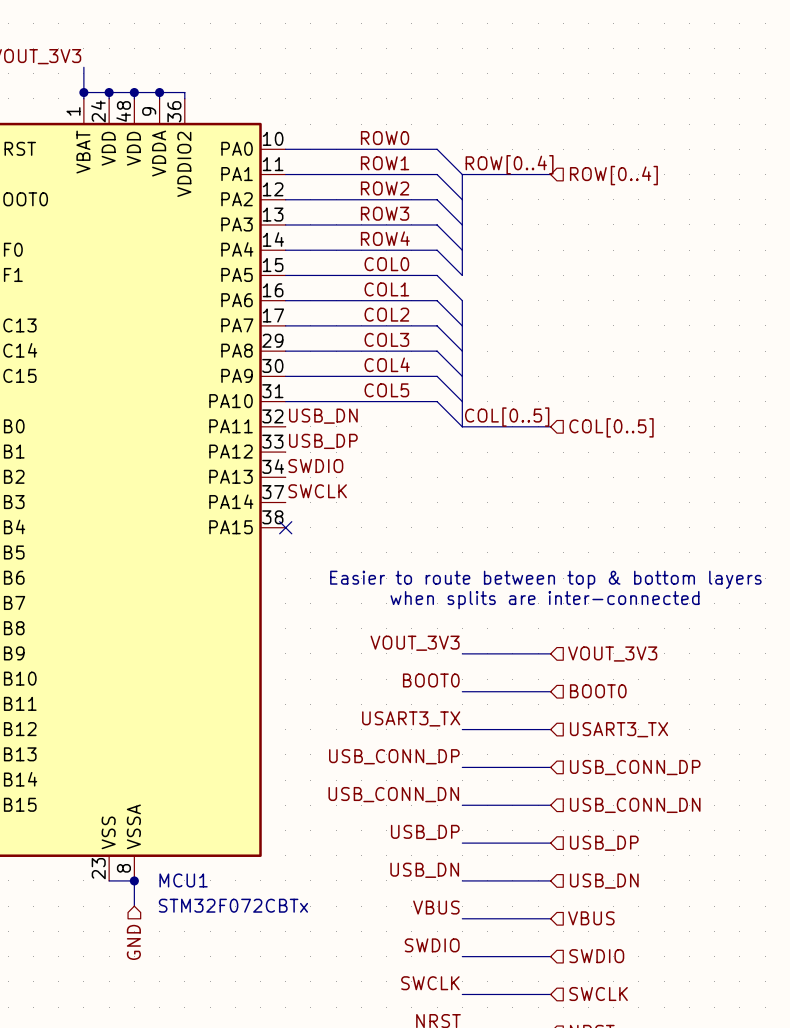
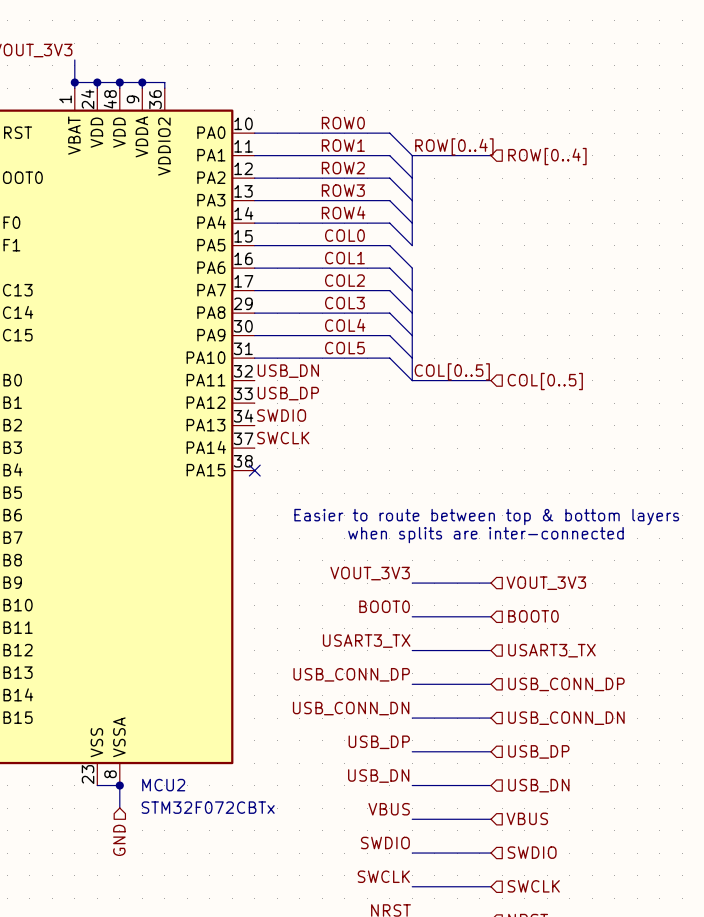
MCU1 name: MCU1 (183, 880) -> MCU2 (163, 785)

